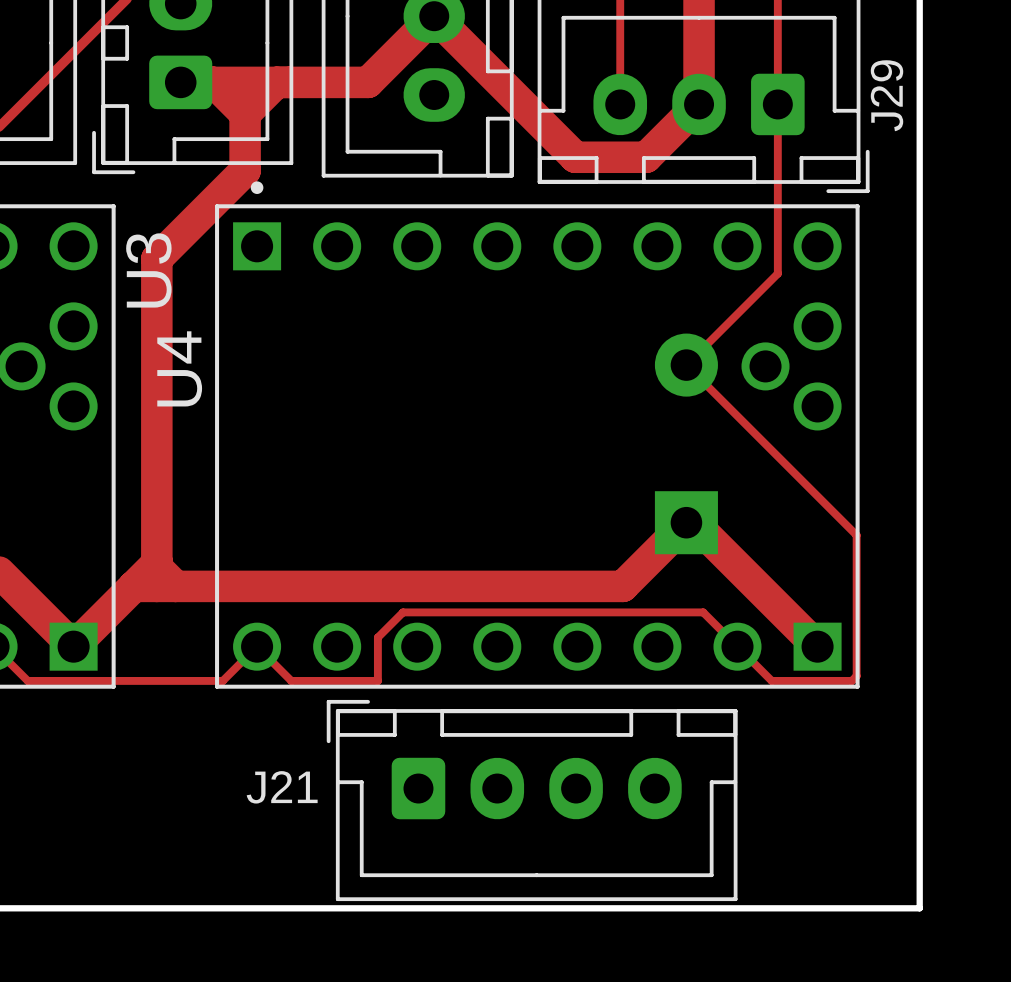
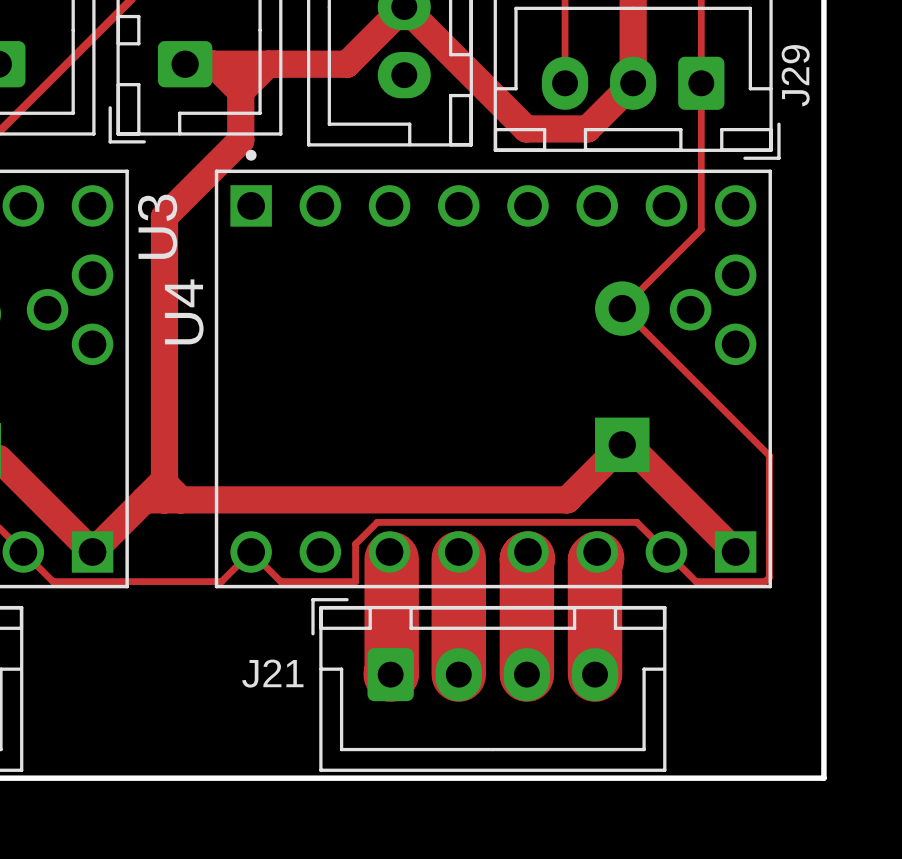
track: none -> (391, 559) (390, 674)
track: none -> (458, 558) (458, 674)
track: none -> (528, 558) (526, 674)
track: none -> (597, 558) (595, 560) (595, 674)

